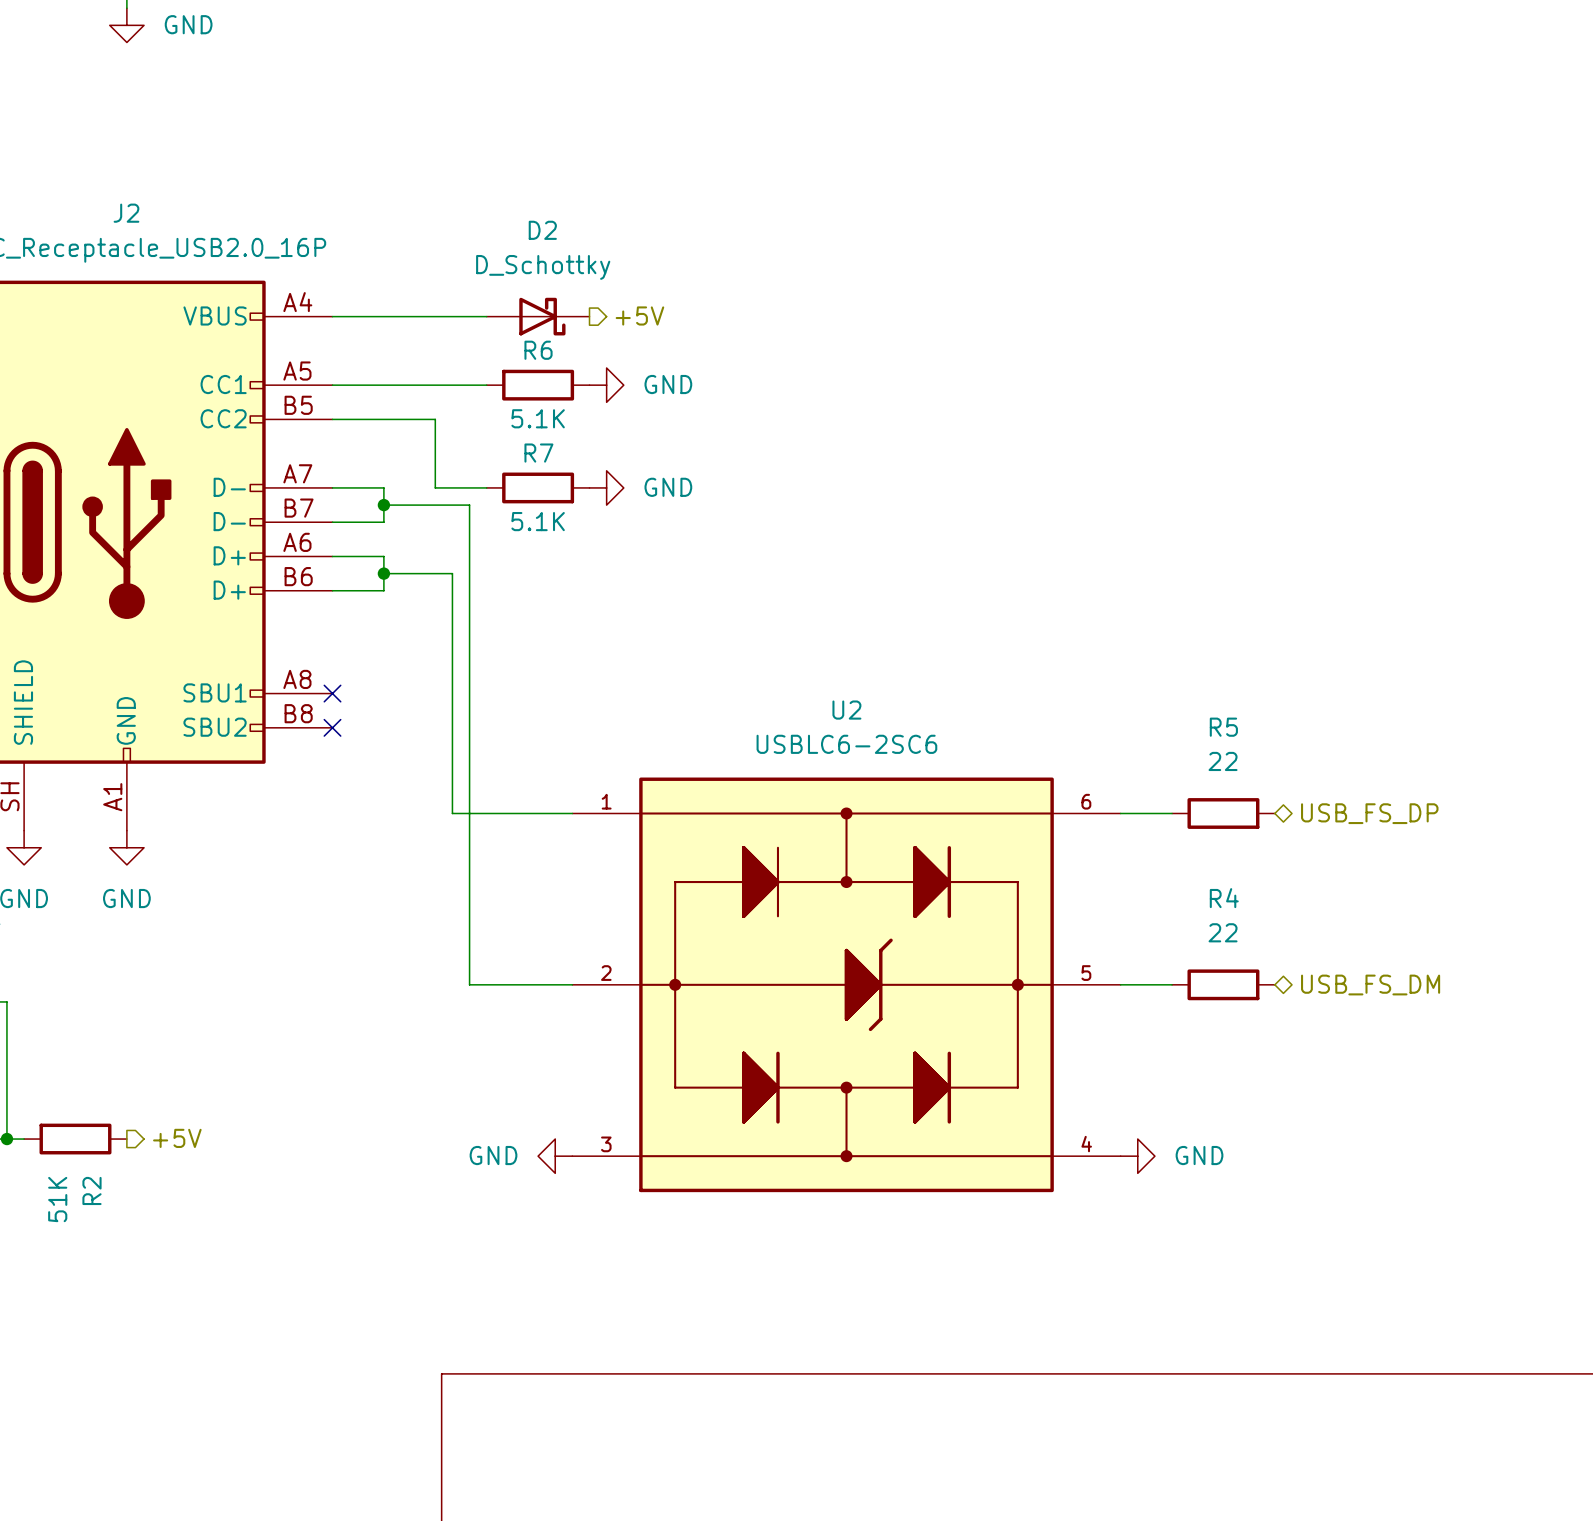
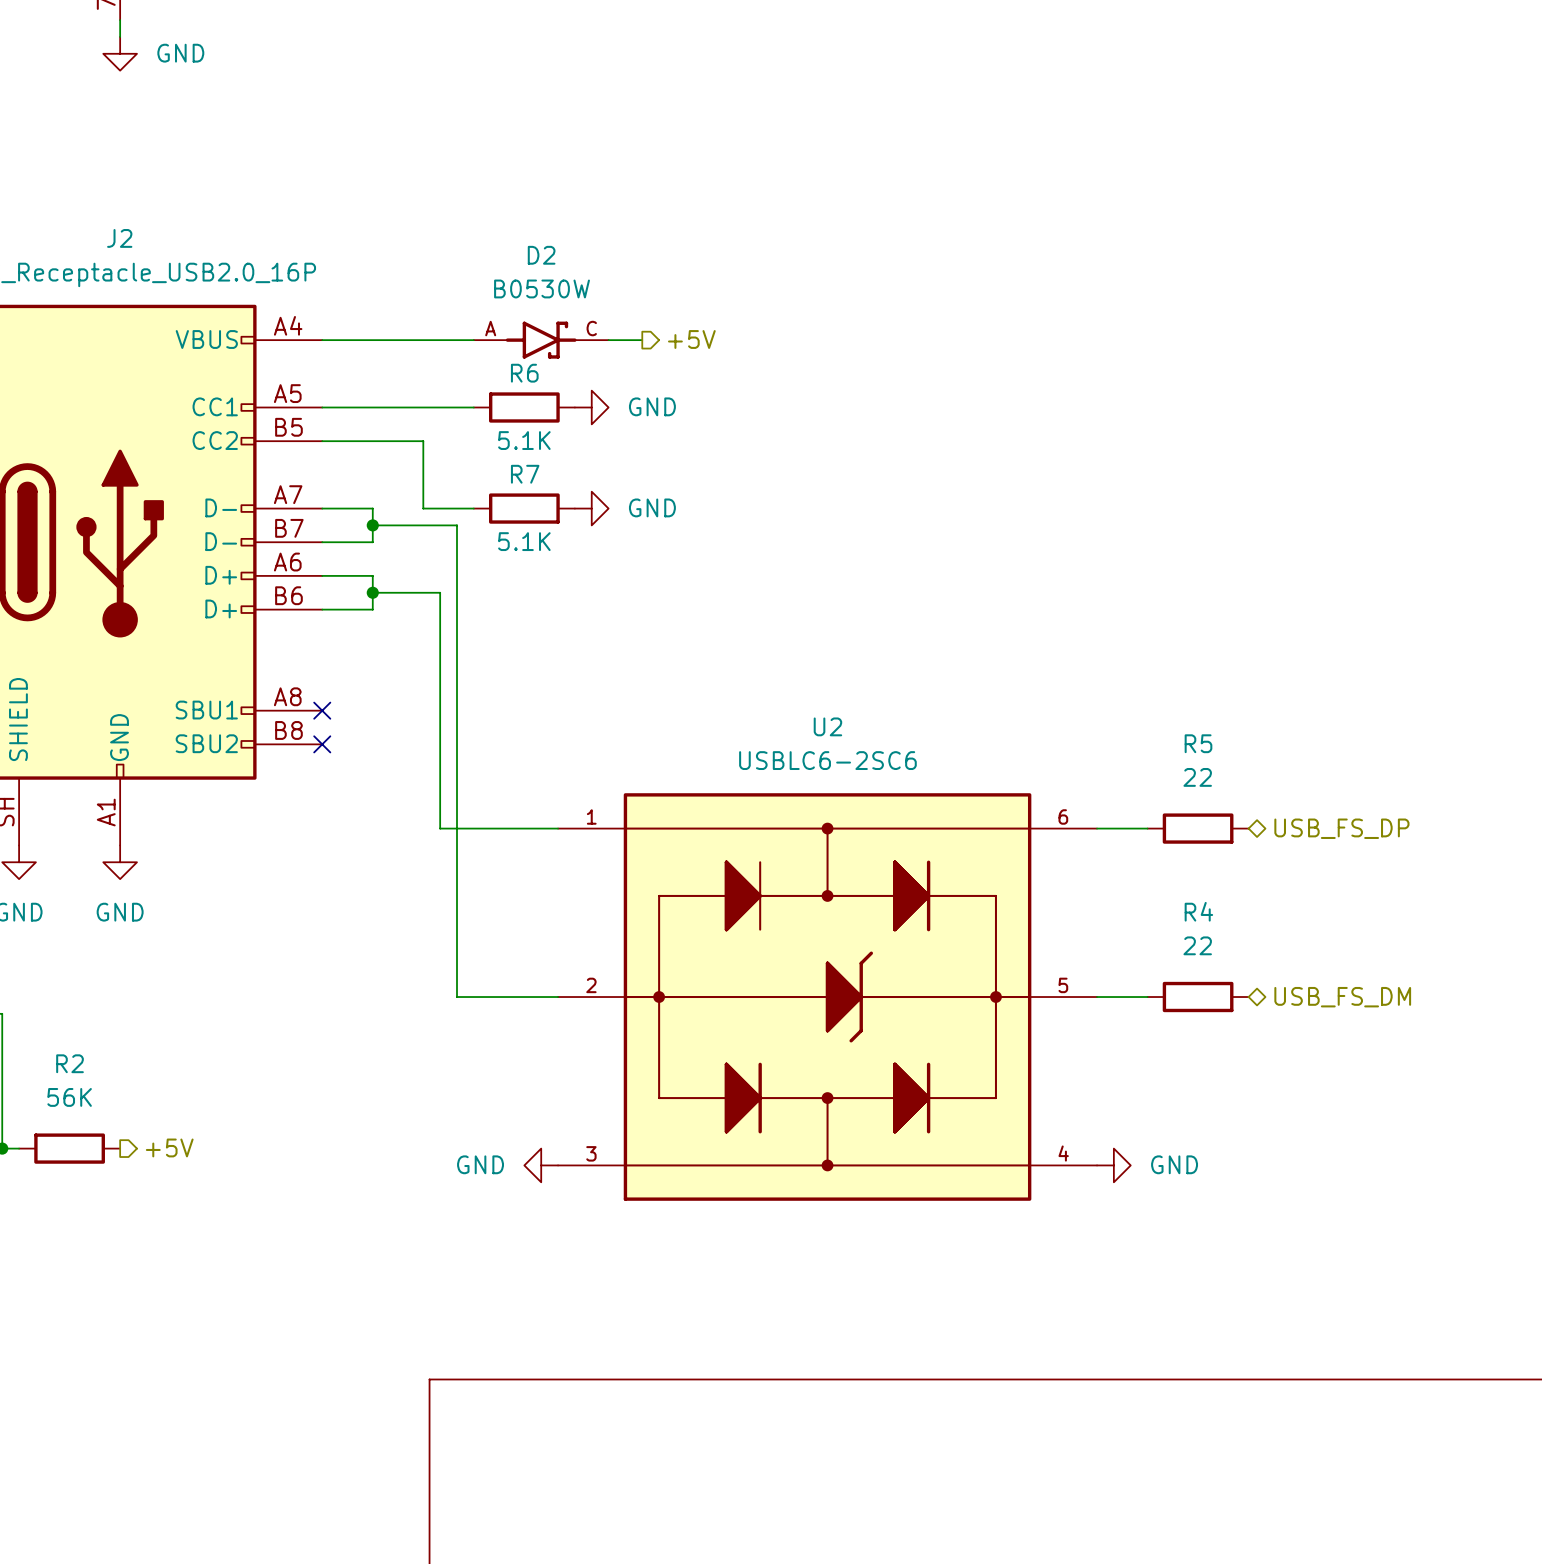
D2 value: D_Schottky (543, 267) -> B0530W (542, 288)
D2 symbol: [486, 297, 590, 336] -> [473, 321, 609, 359]
hierarchical label position: +5V (639, 315) -> +5V (691, 339)
wire: none -> (608, 340) (642, 340)
R2 name rotation: 0° (91, 1190) -> 90° clockwise (70, 1063)
R2 name position: R2 (91, 1190) -> R2 (70, 1063)
R2 value: 51K (57, 1199) -> 56K (69, 1097)

